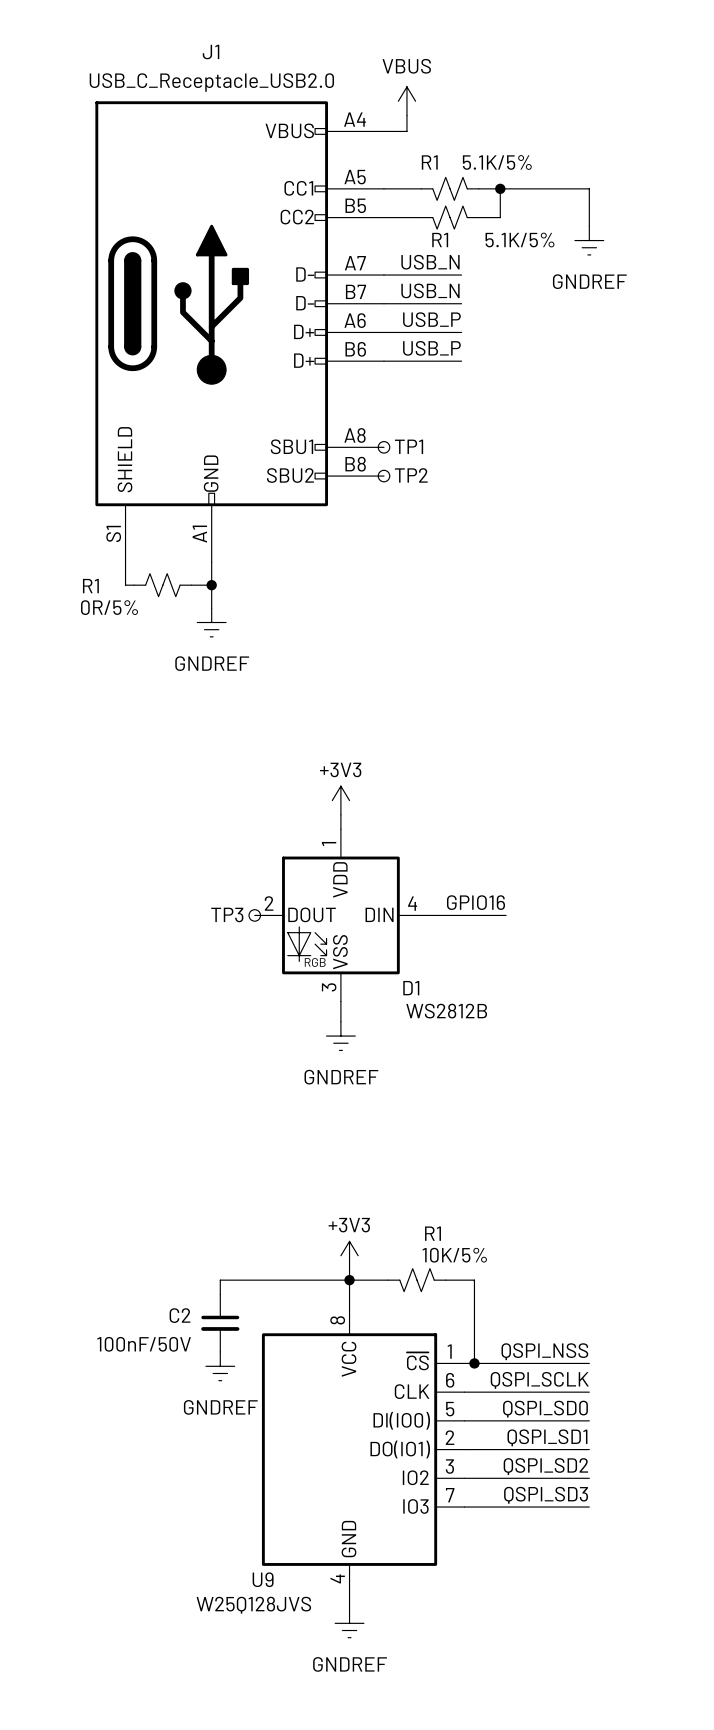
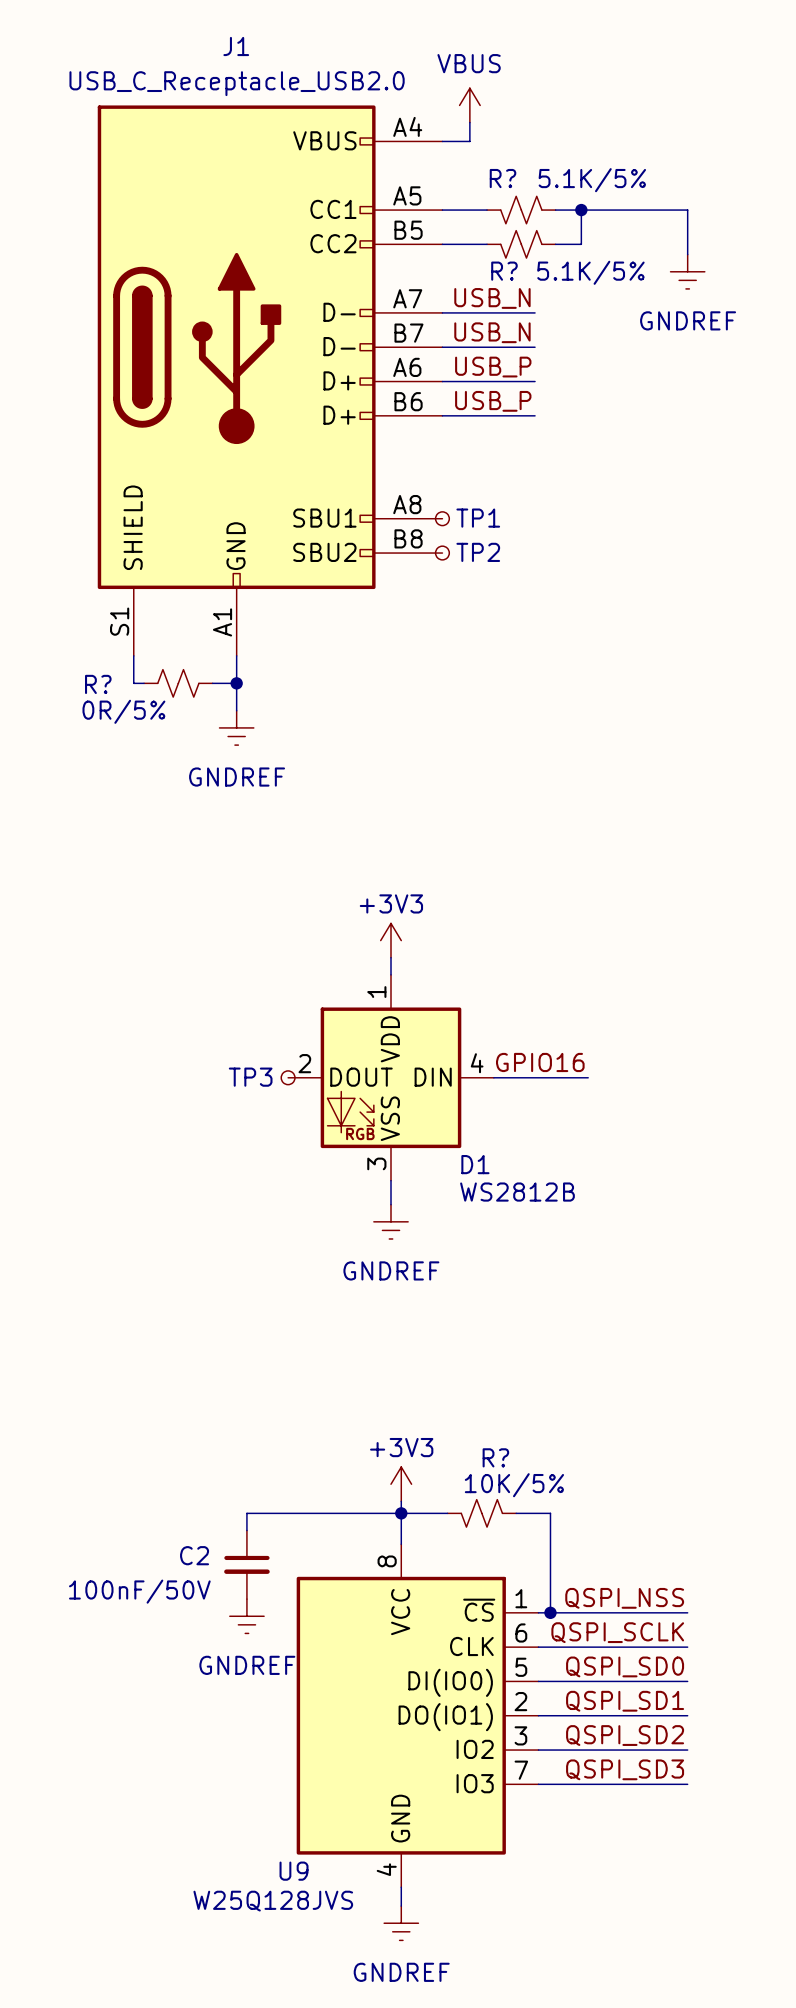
R1 name: R1 (429, 162) -> R? (503, 178)
R1 name: R1 (440, 240) -> R? (504, 271)
R1 name: R1 (90, 586) -> R? (98, 684)
R1 name: R1 (433, 1233) -> R? (495, 1457)

